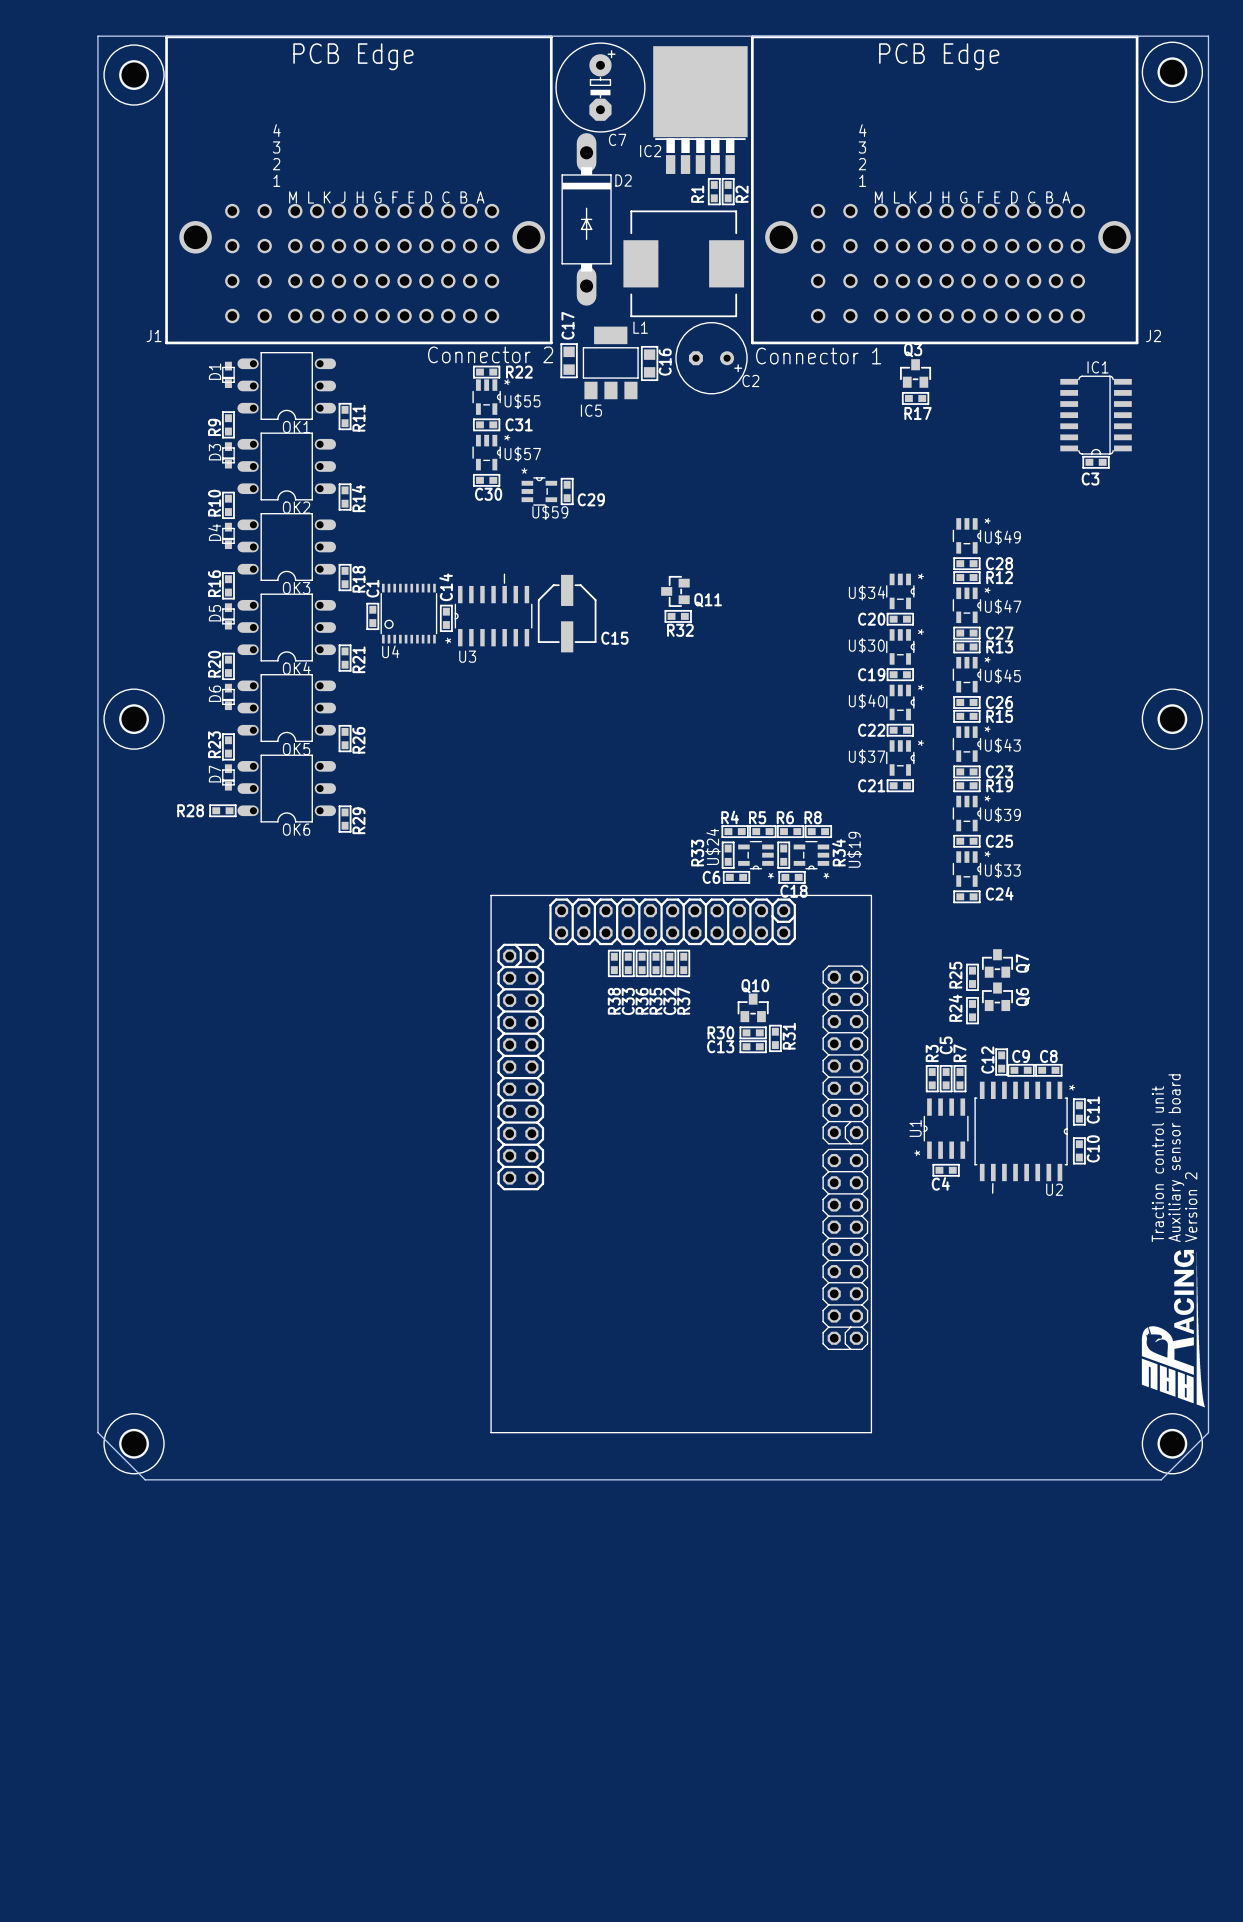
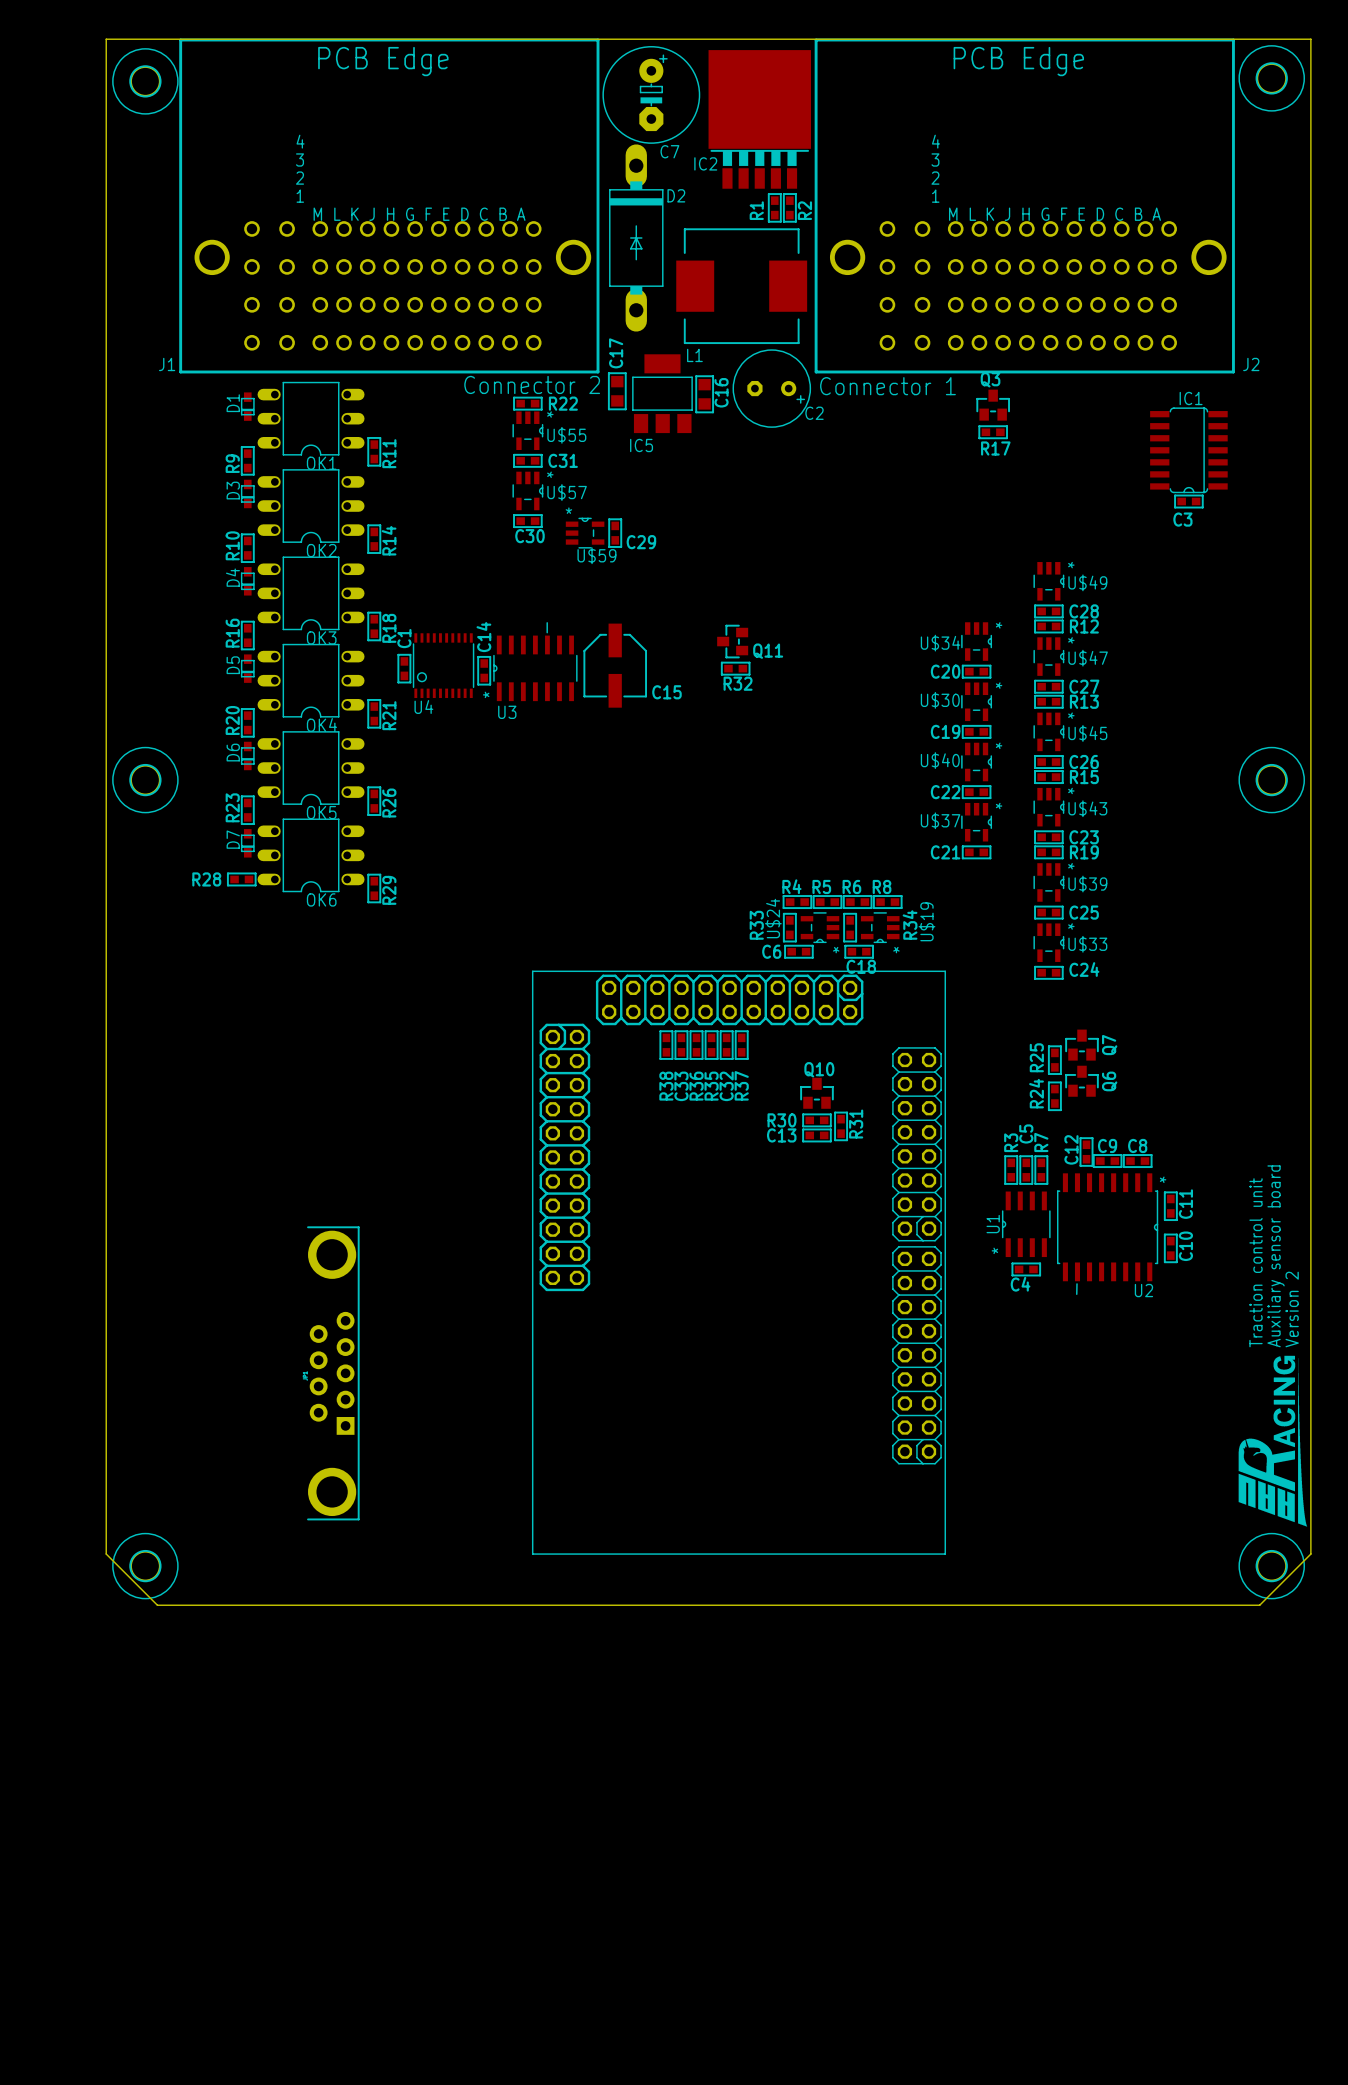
part: none -> (333, 1373)

